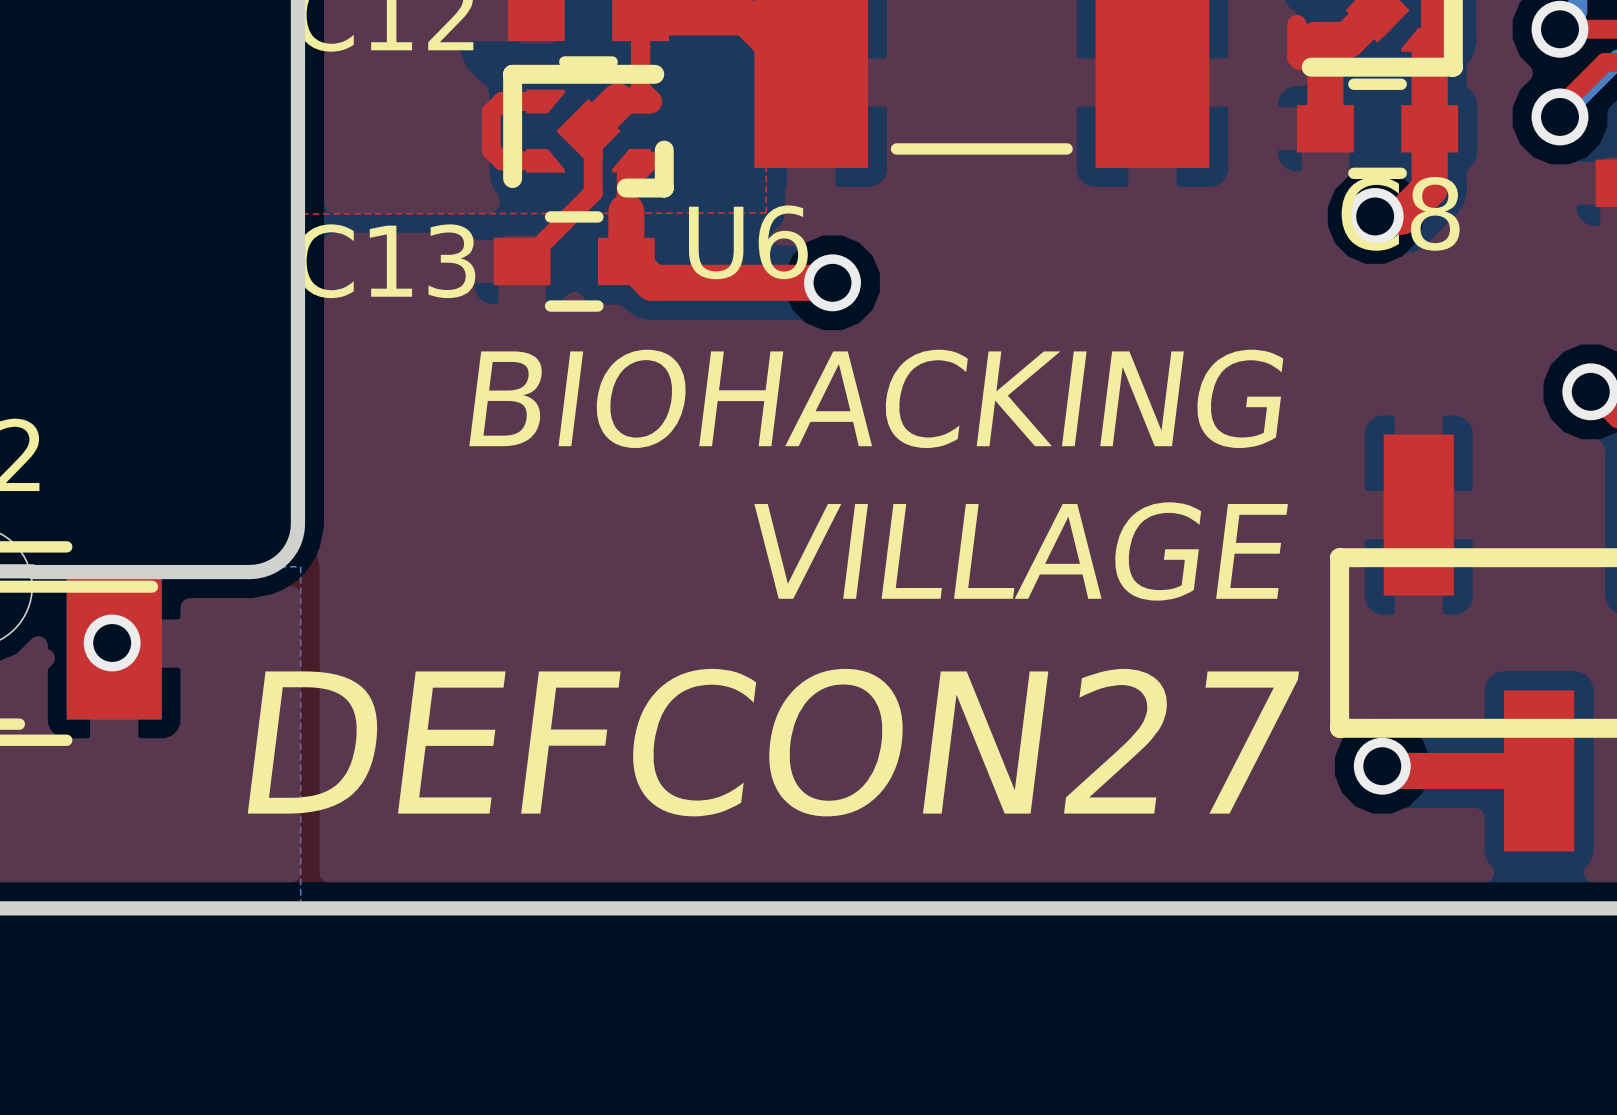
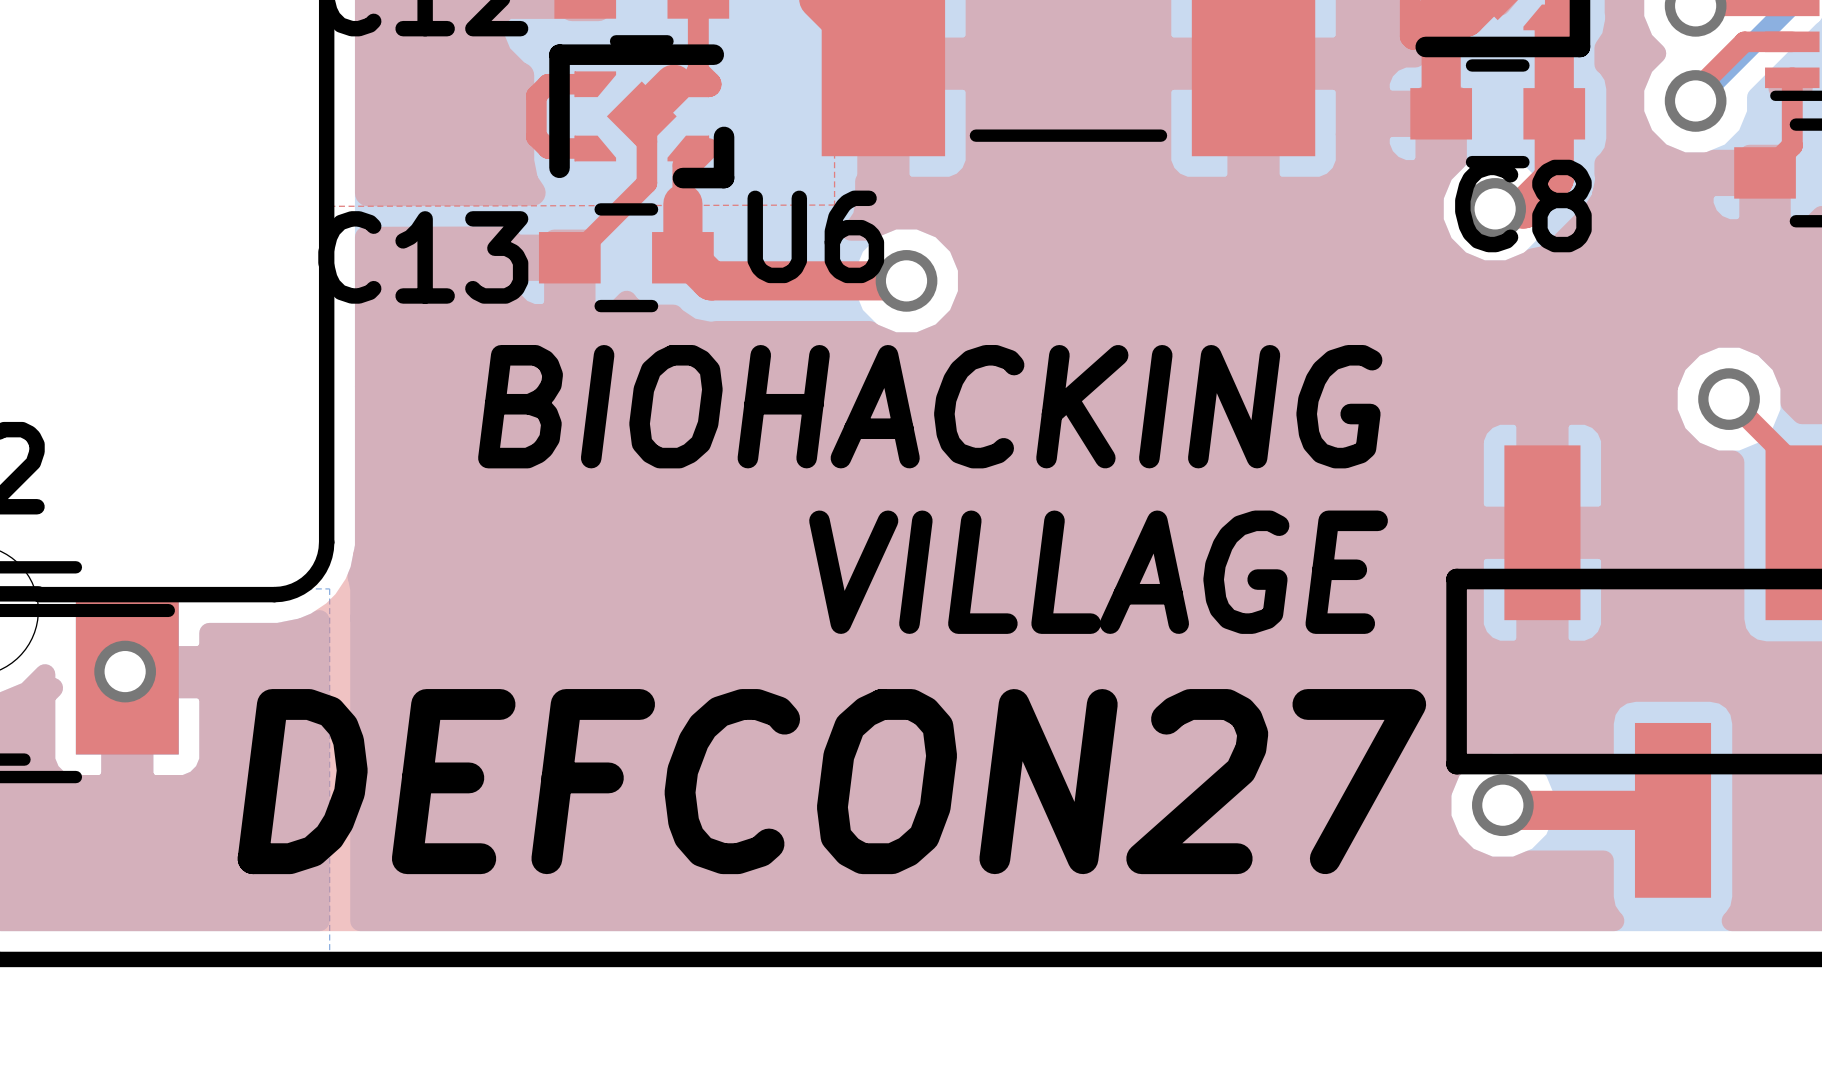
text position: DEFCON27 (773, 742) -> DEFCON27 (831, 781)

